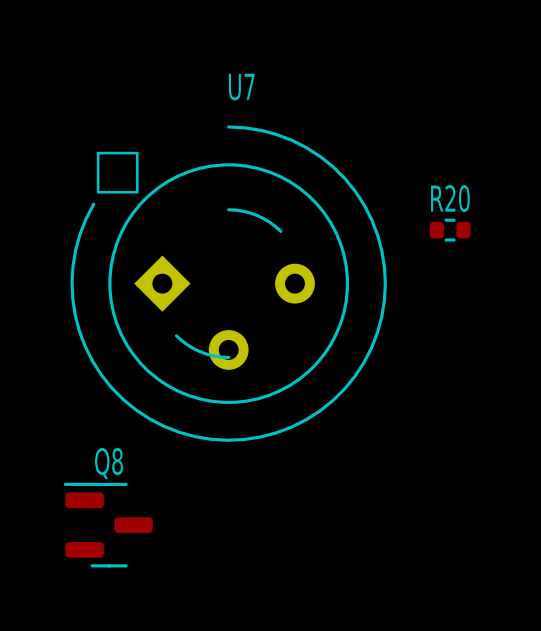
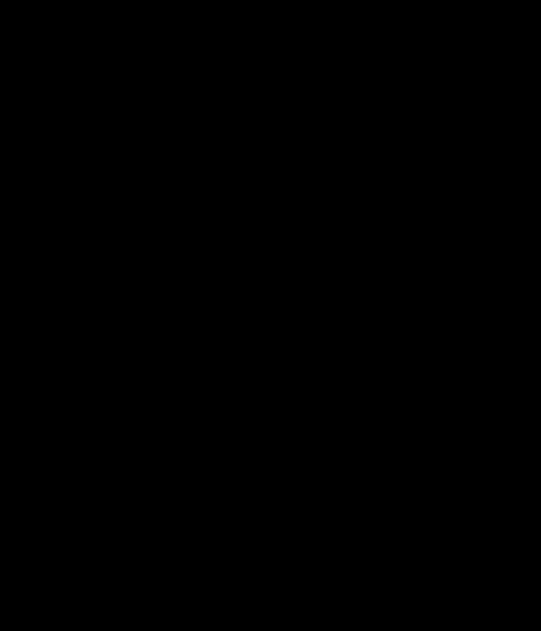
R20: (450, 230) -> none
U7: (228, 283) -> none
Q8: (108, 525) -> none

